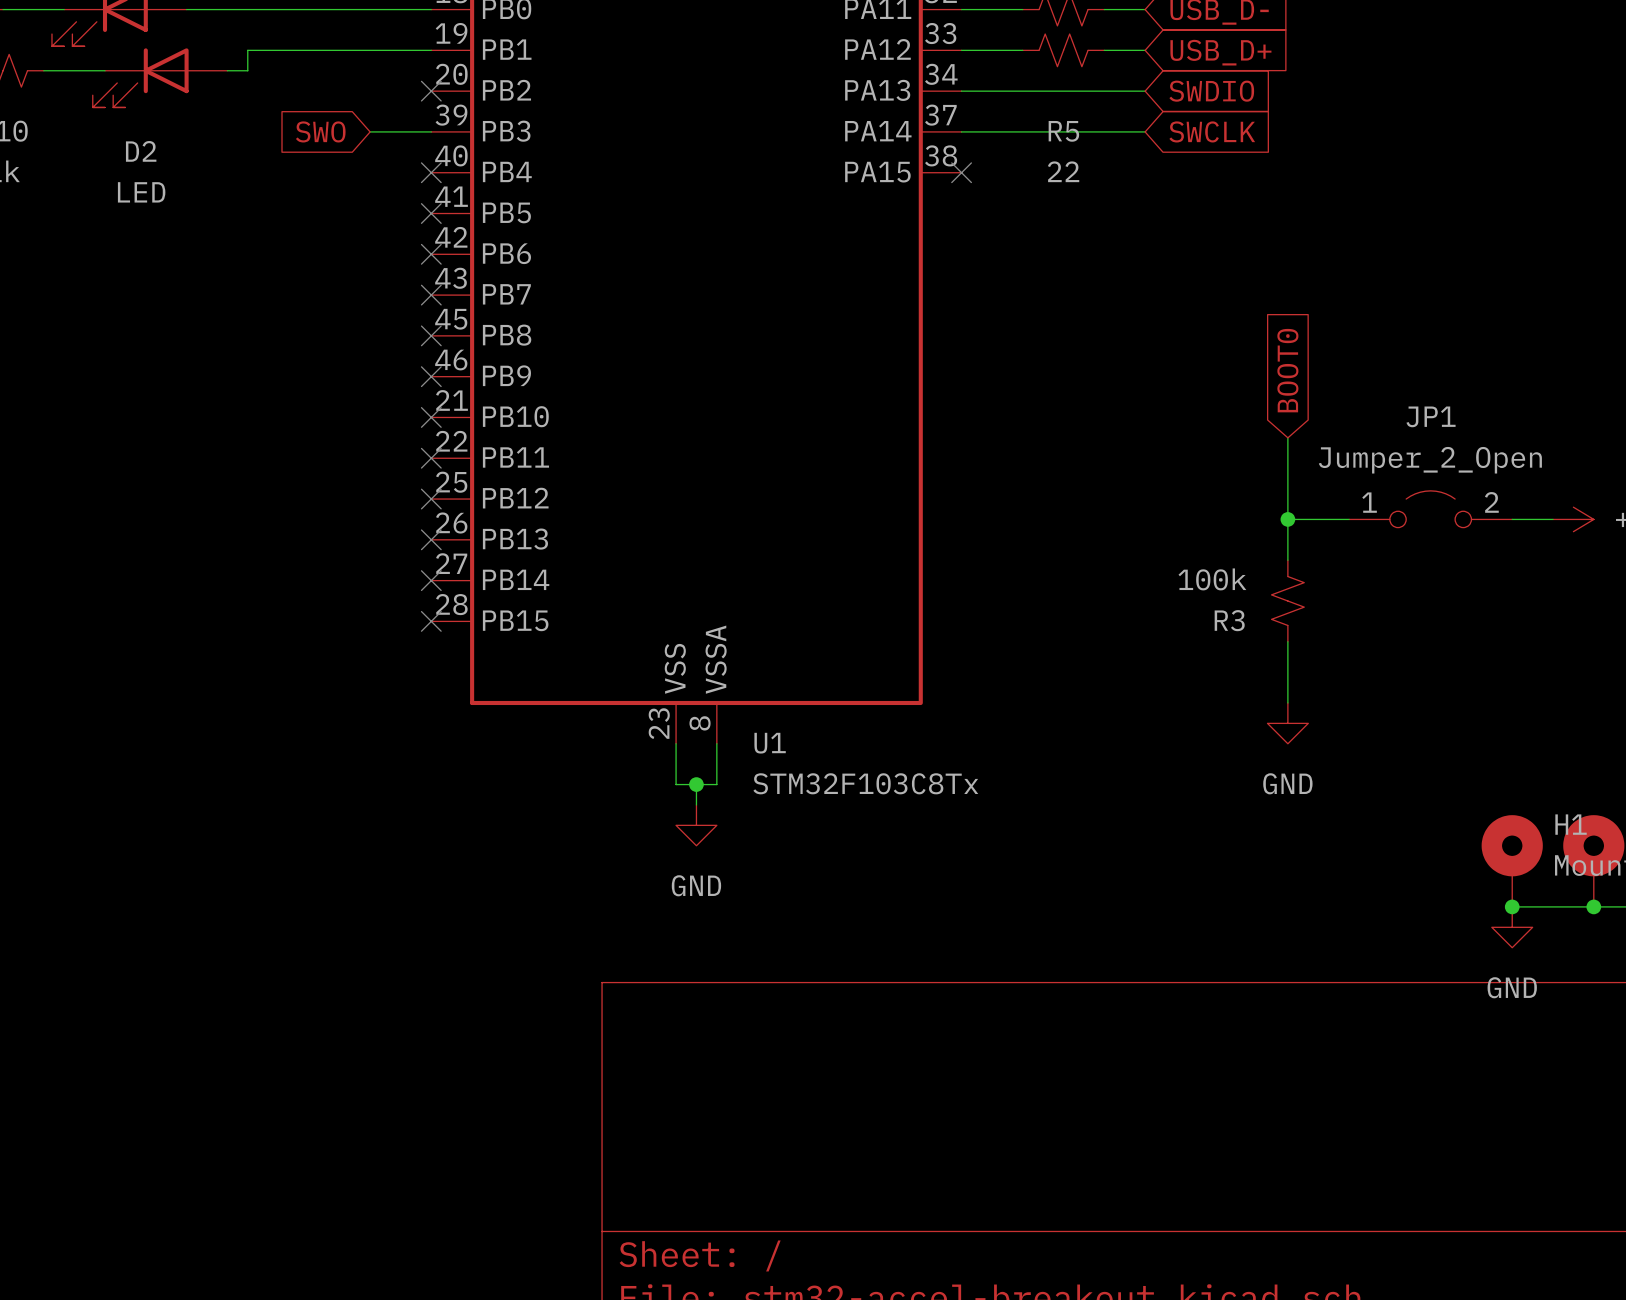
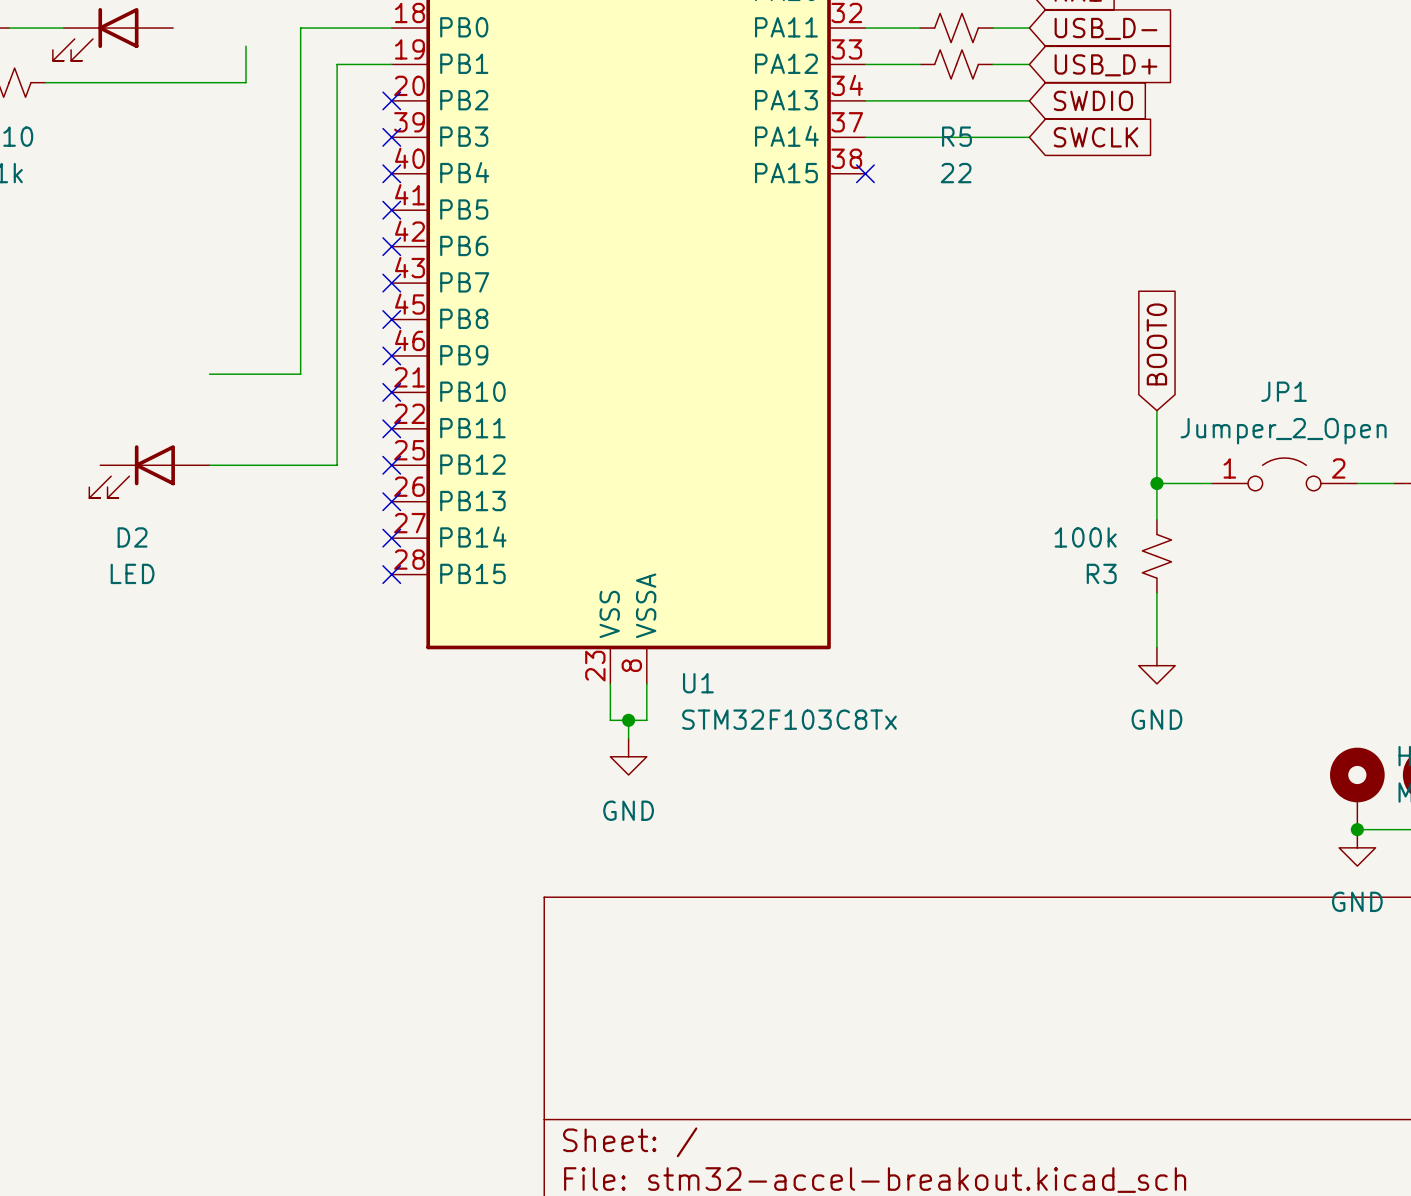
wire: (186, 9) (329, 9) -> (209, 374) (300, 374) (300, 28)
wire: (370, 50) (247, 50) (247, 70) -> (246, 46) (246, 82) (227, 82)
wire: none -> (337, 64) (337, 465) (209, 465)
D2 position: (160, 77) -> (149, 471)
global label: SWO (320, 131) -> none
wire: (370, 131) (431, 131) -> none
no-connect mark: none -> (391, 137)

